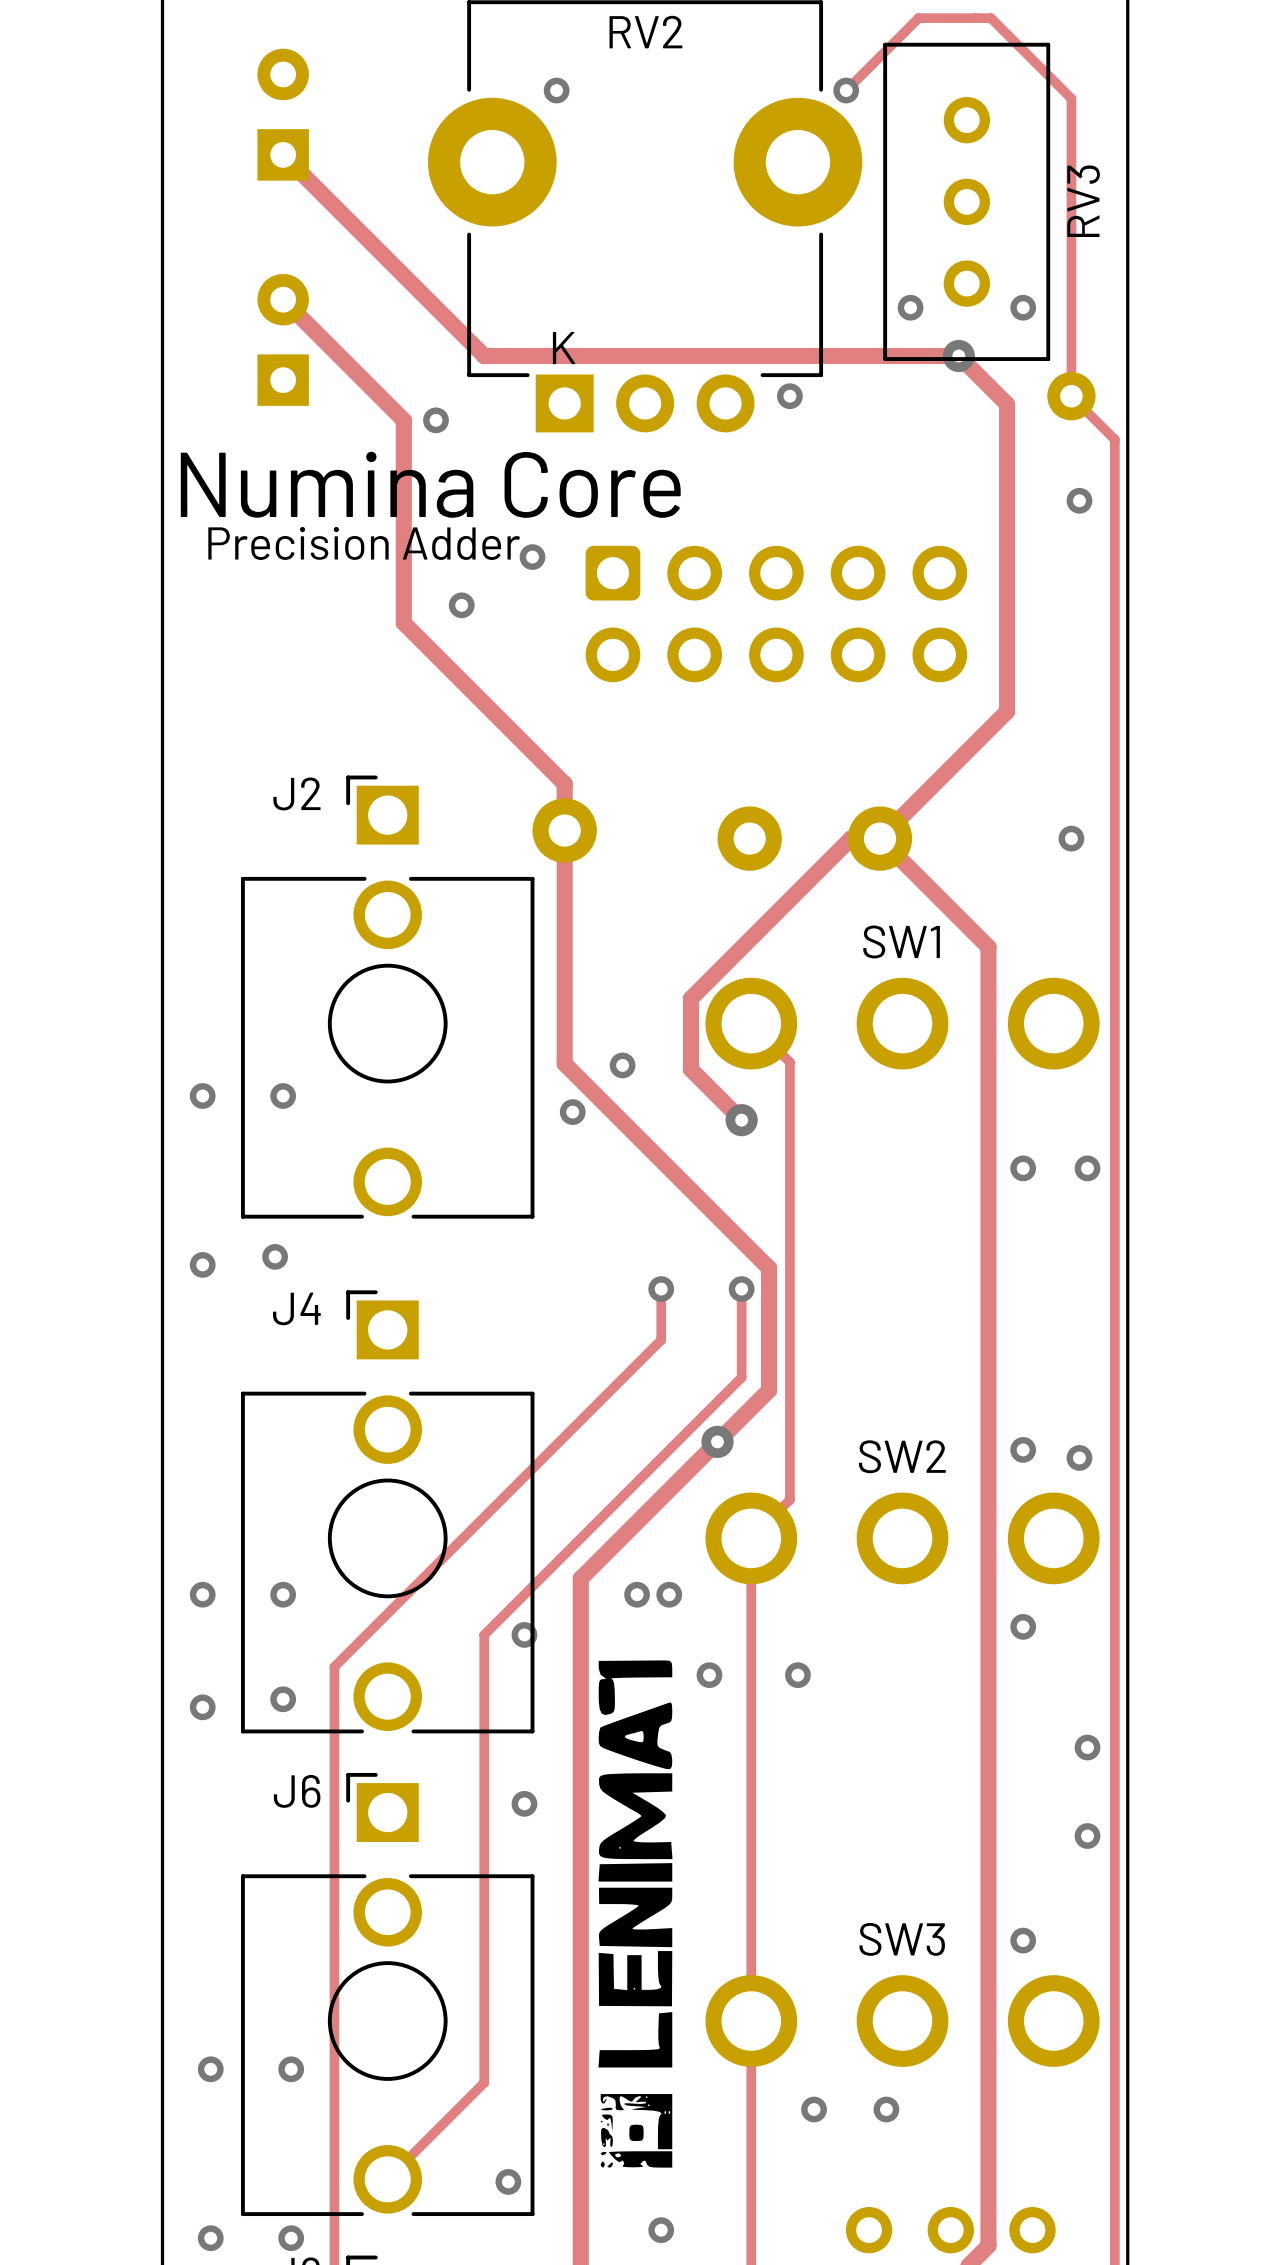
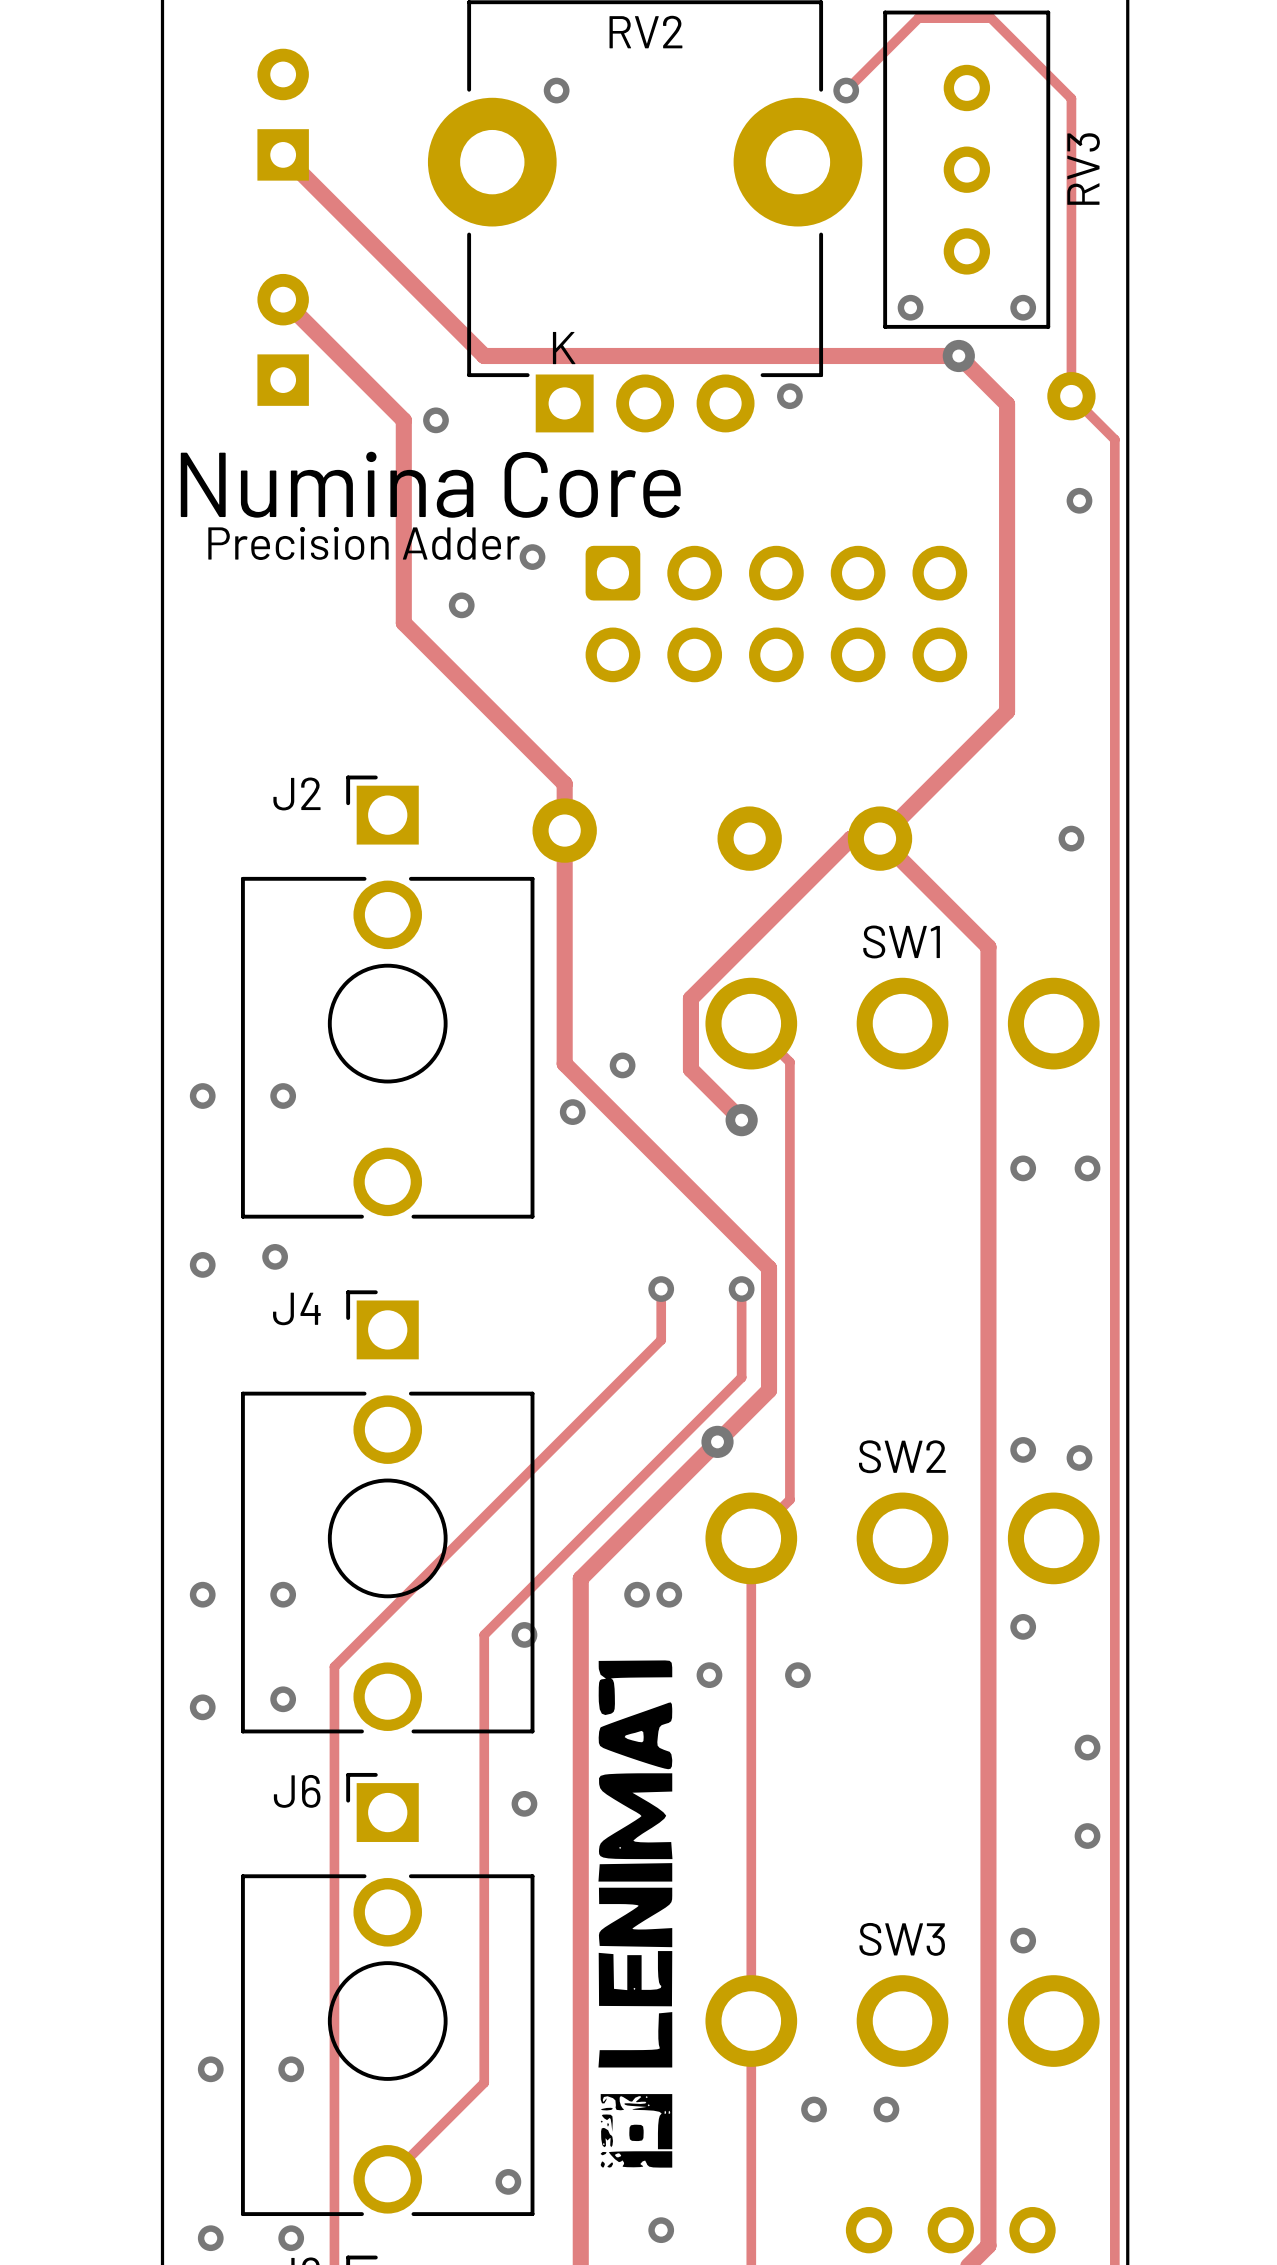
RV3 position: (966, 201) -> (966, 169)

